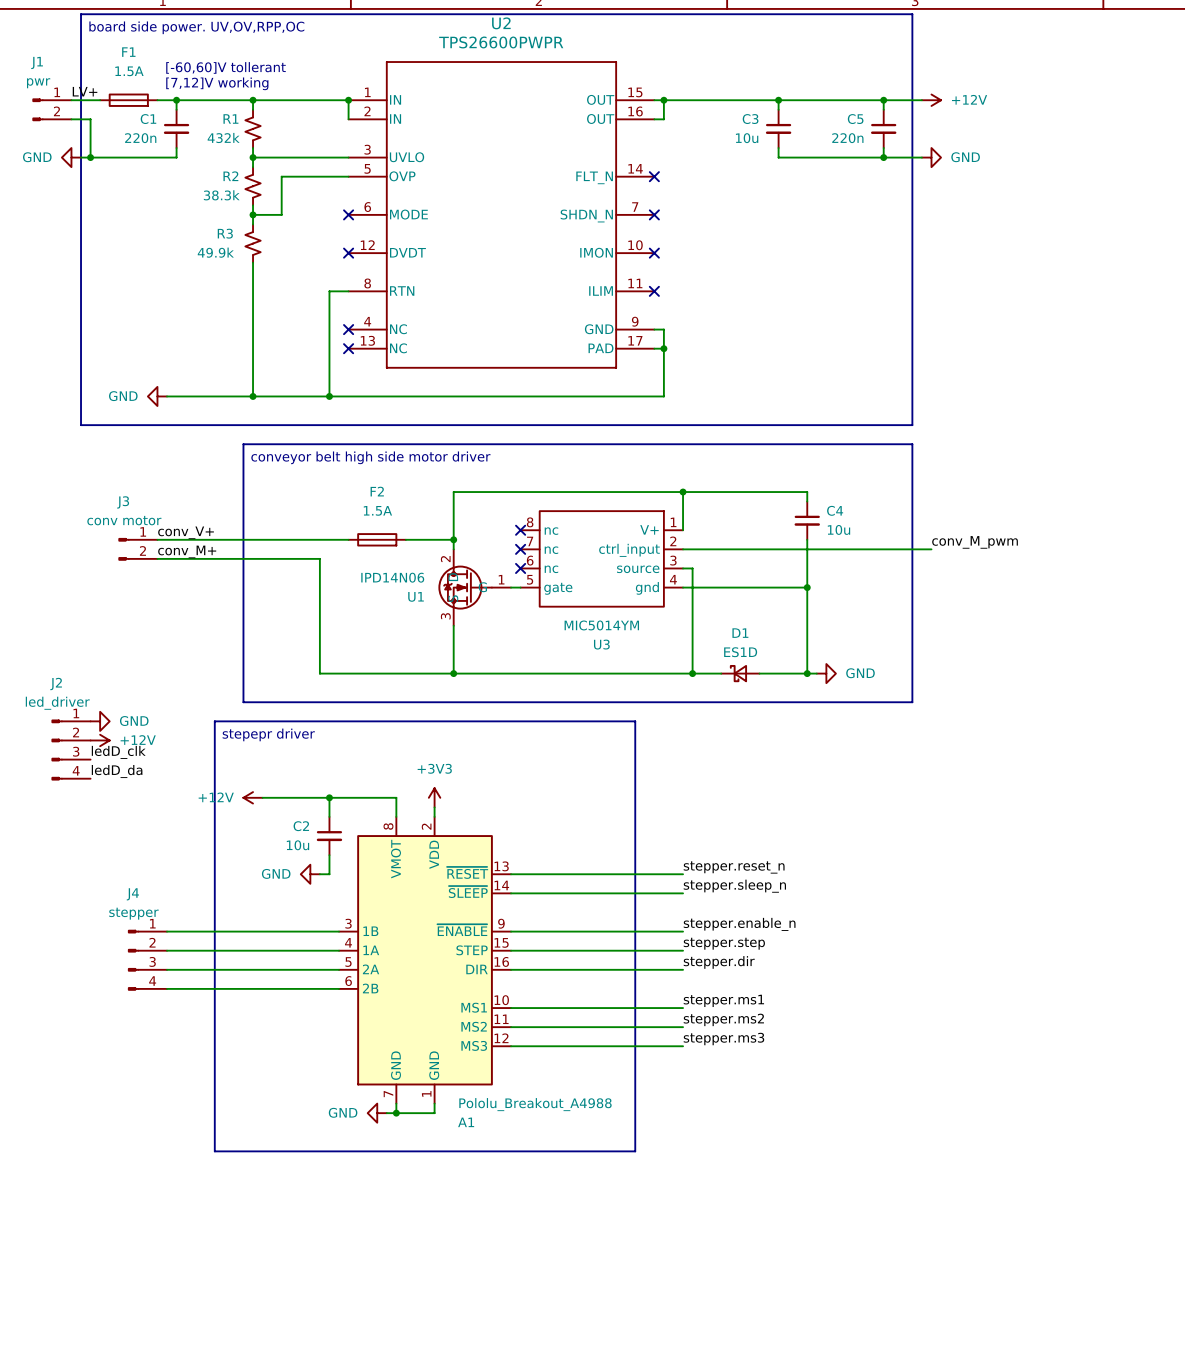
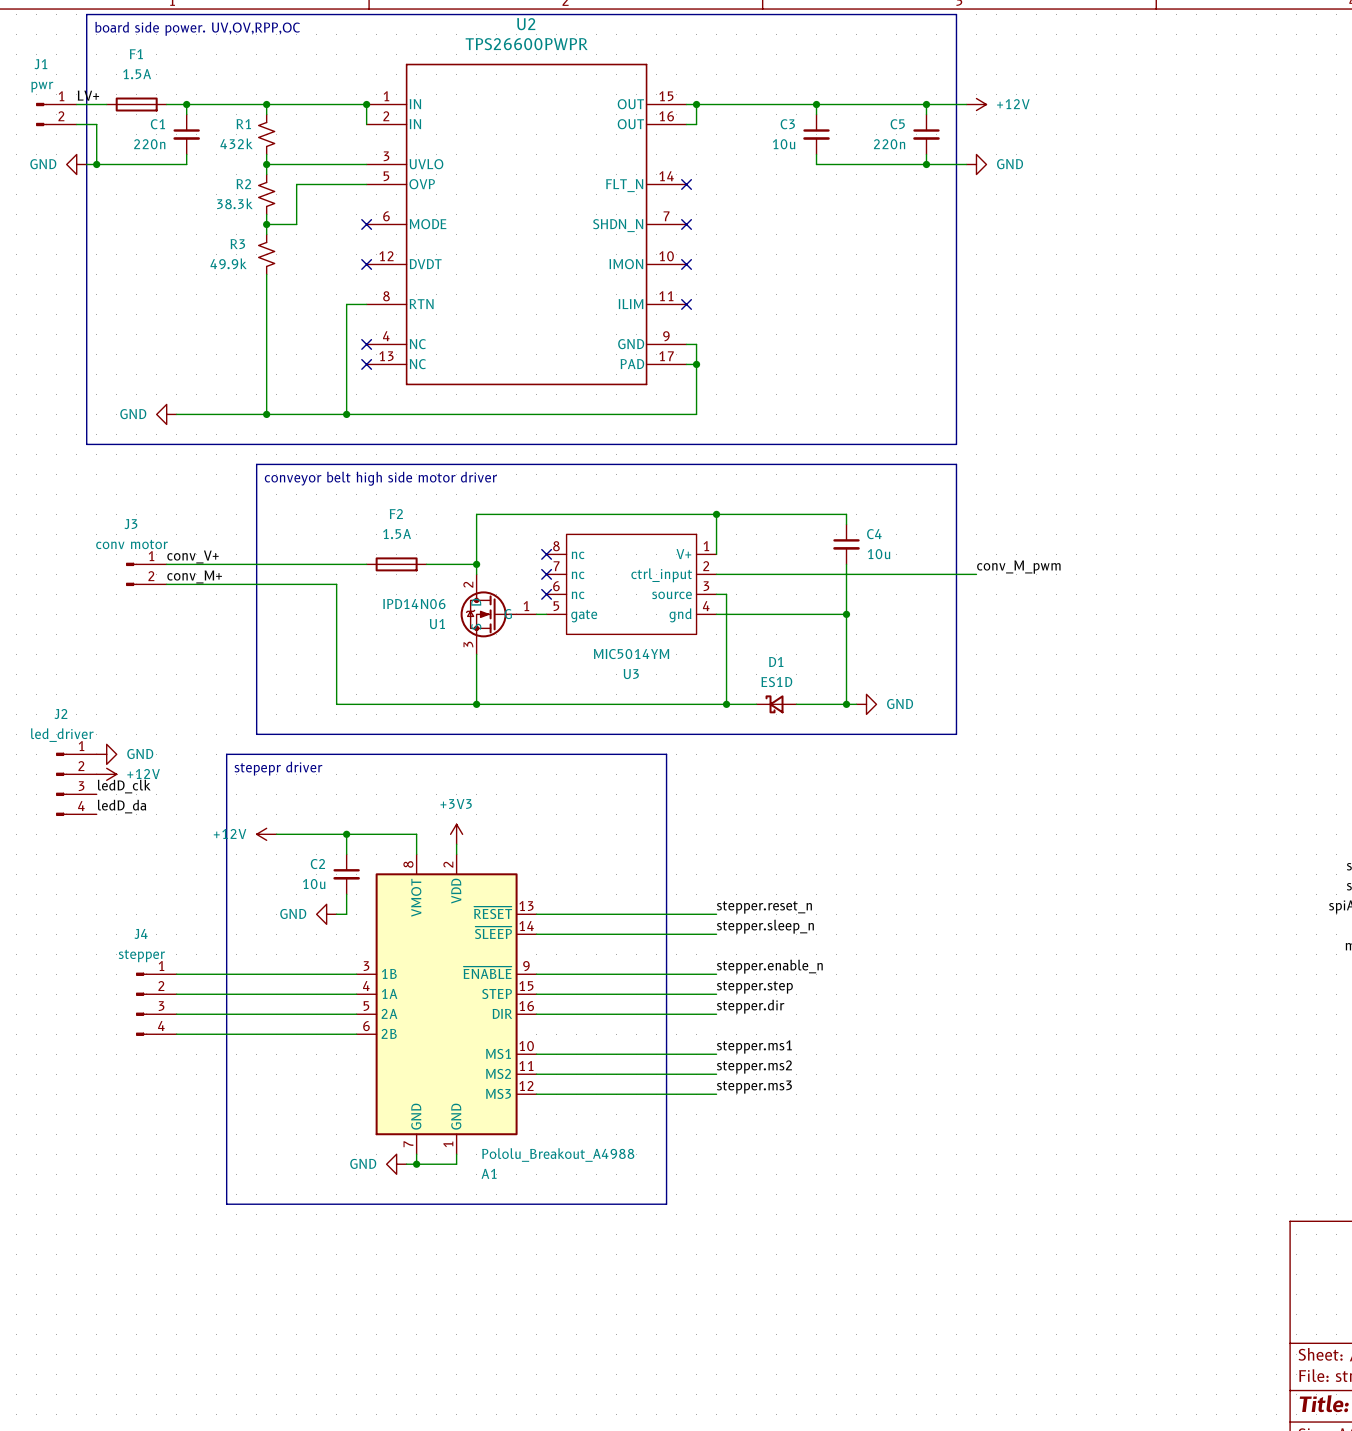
text: [-60,60]V tollerant (226, 67) -> none
text: [7,12]V working (217, 83) -> none

